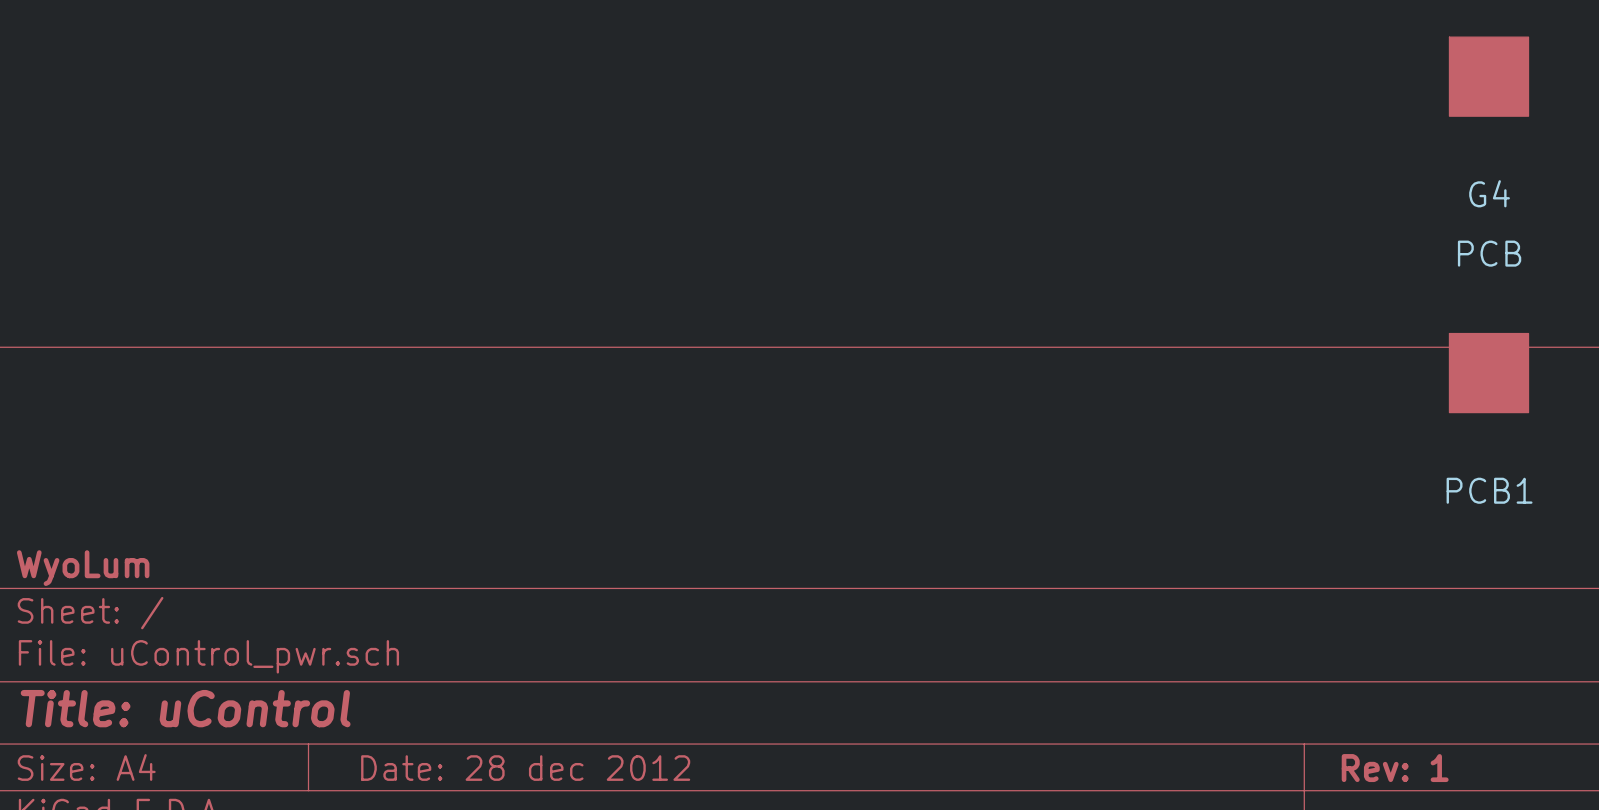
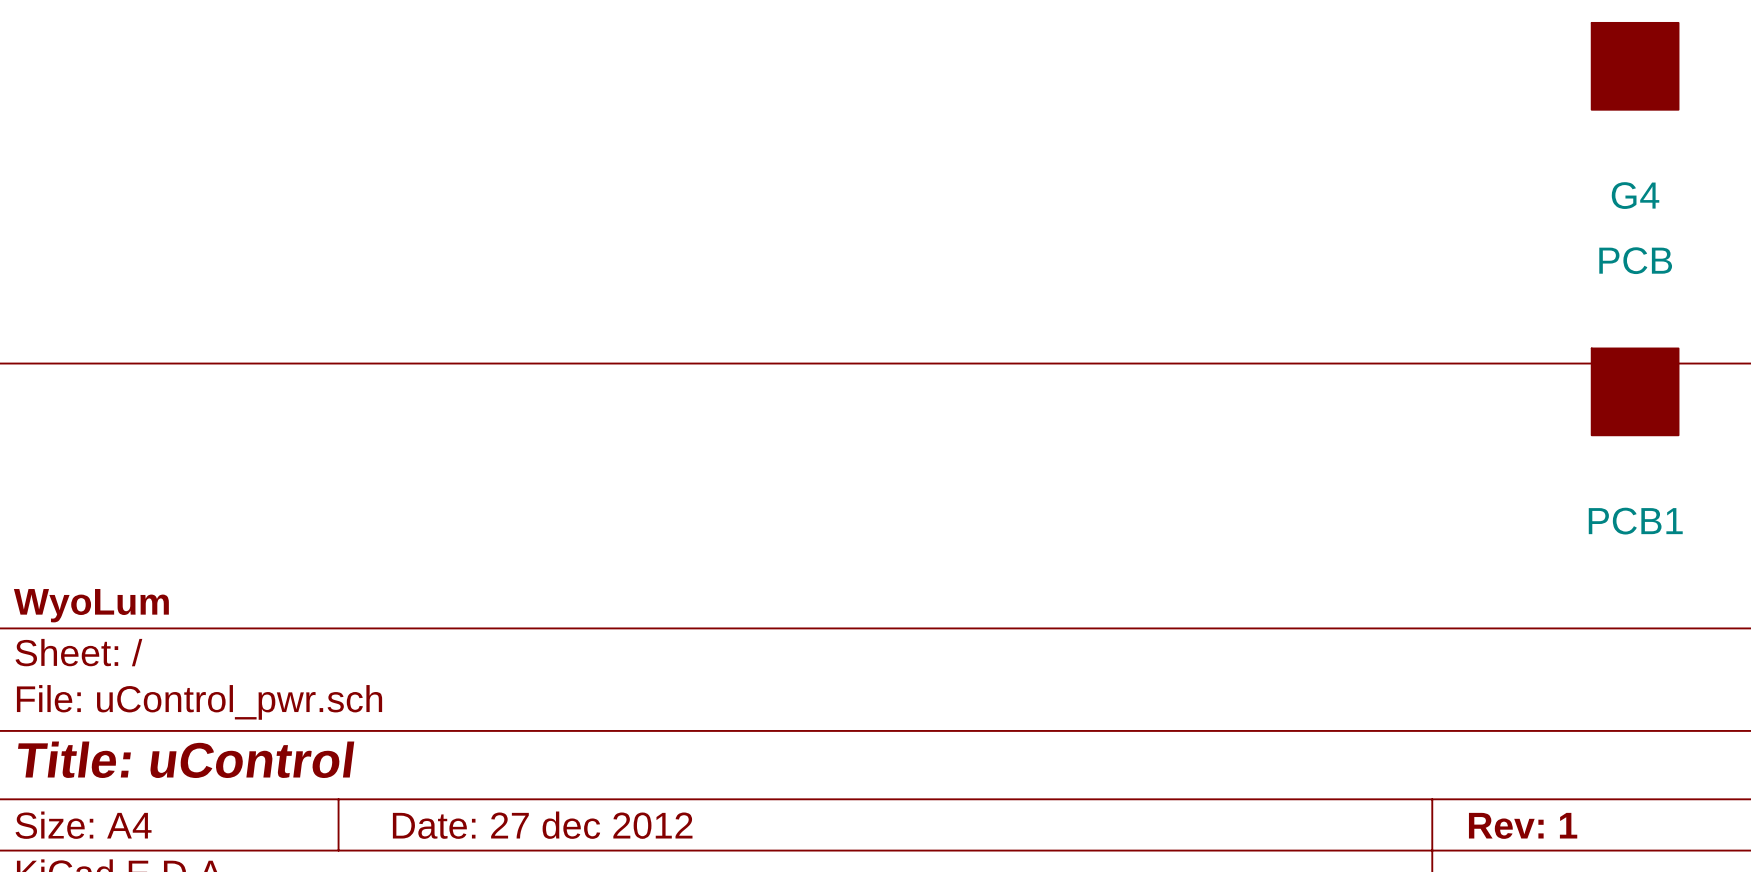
title block: Date: 28 dec 2012 (525, 768) -> Date: 27 dec 2012 (542, 825)

